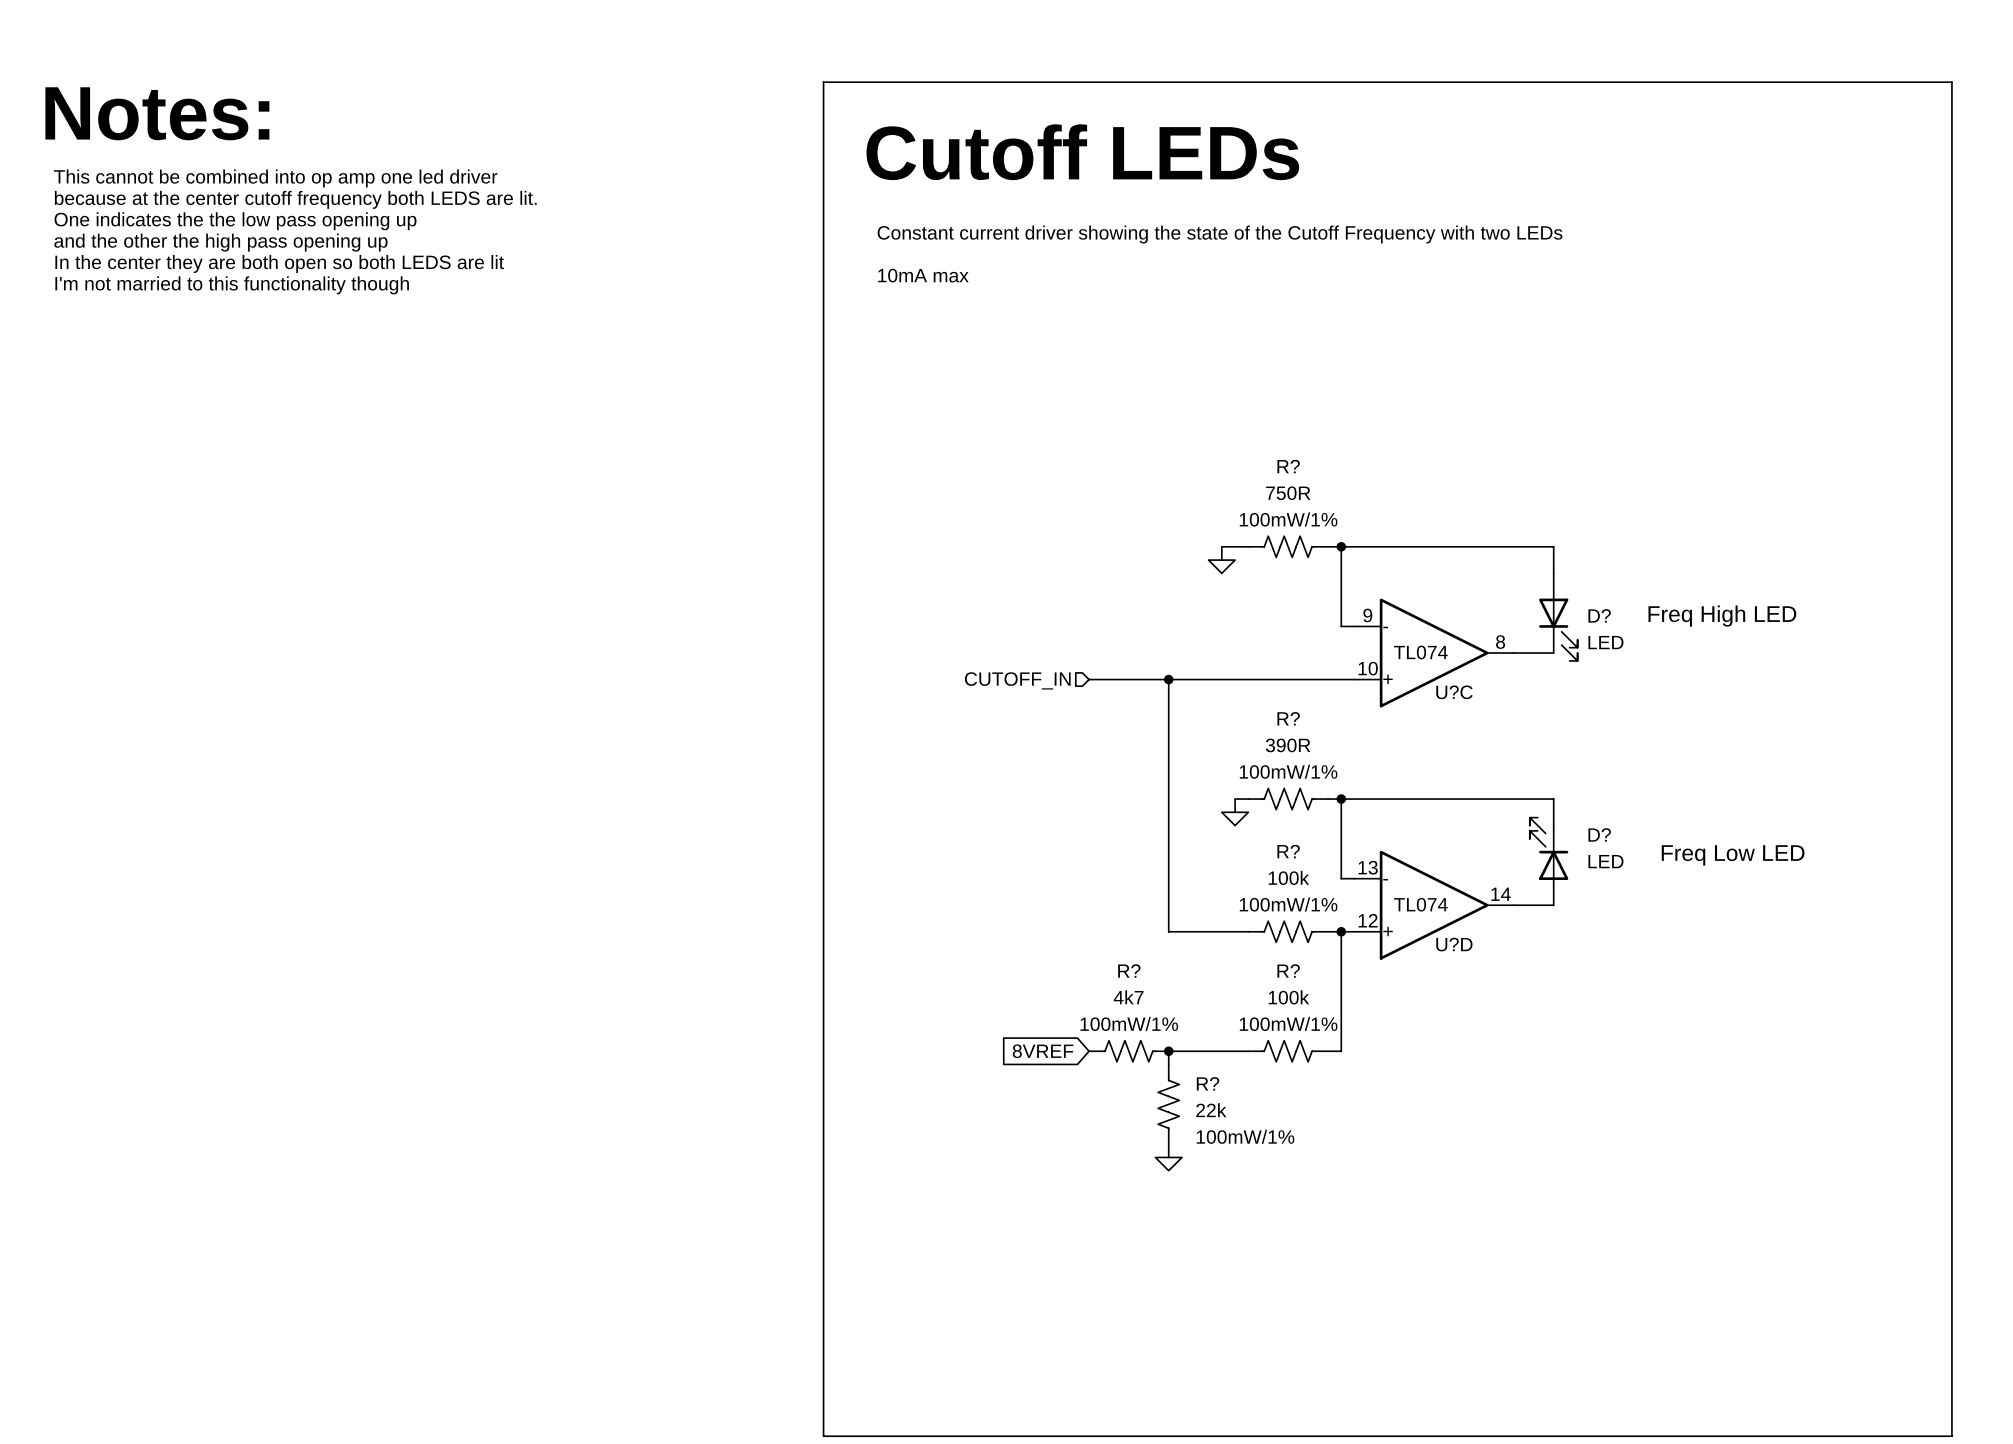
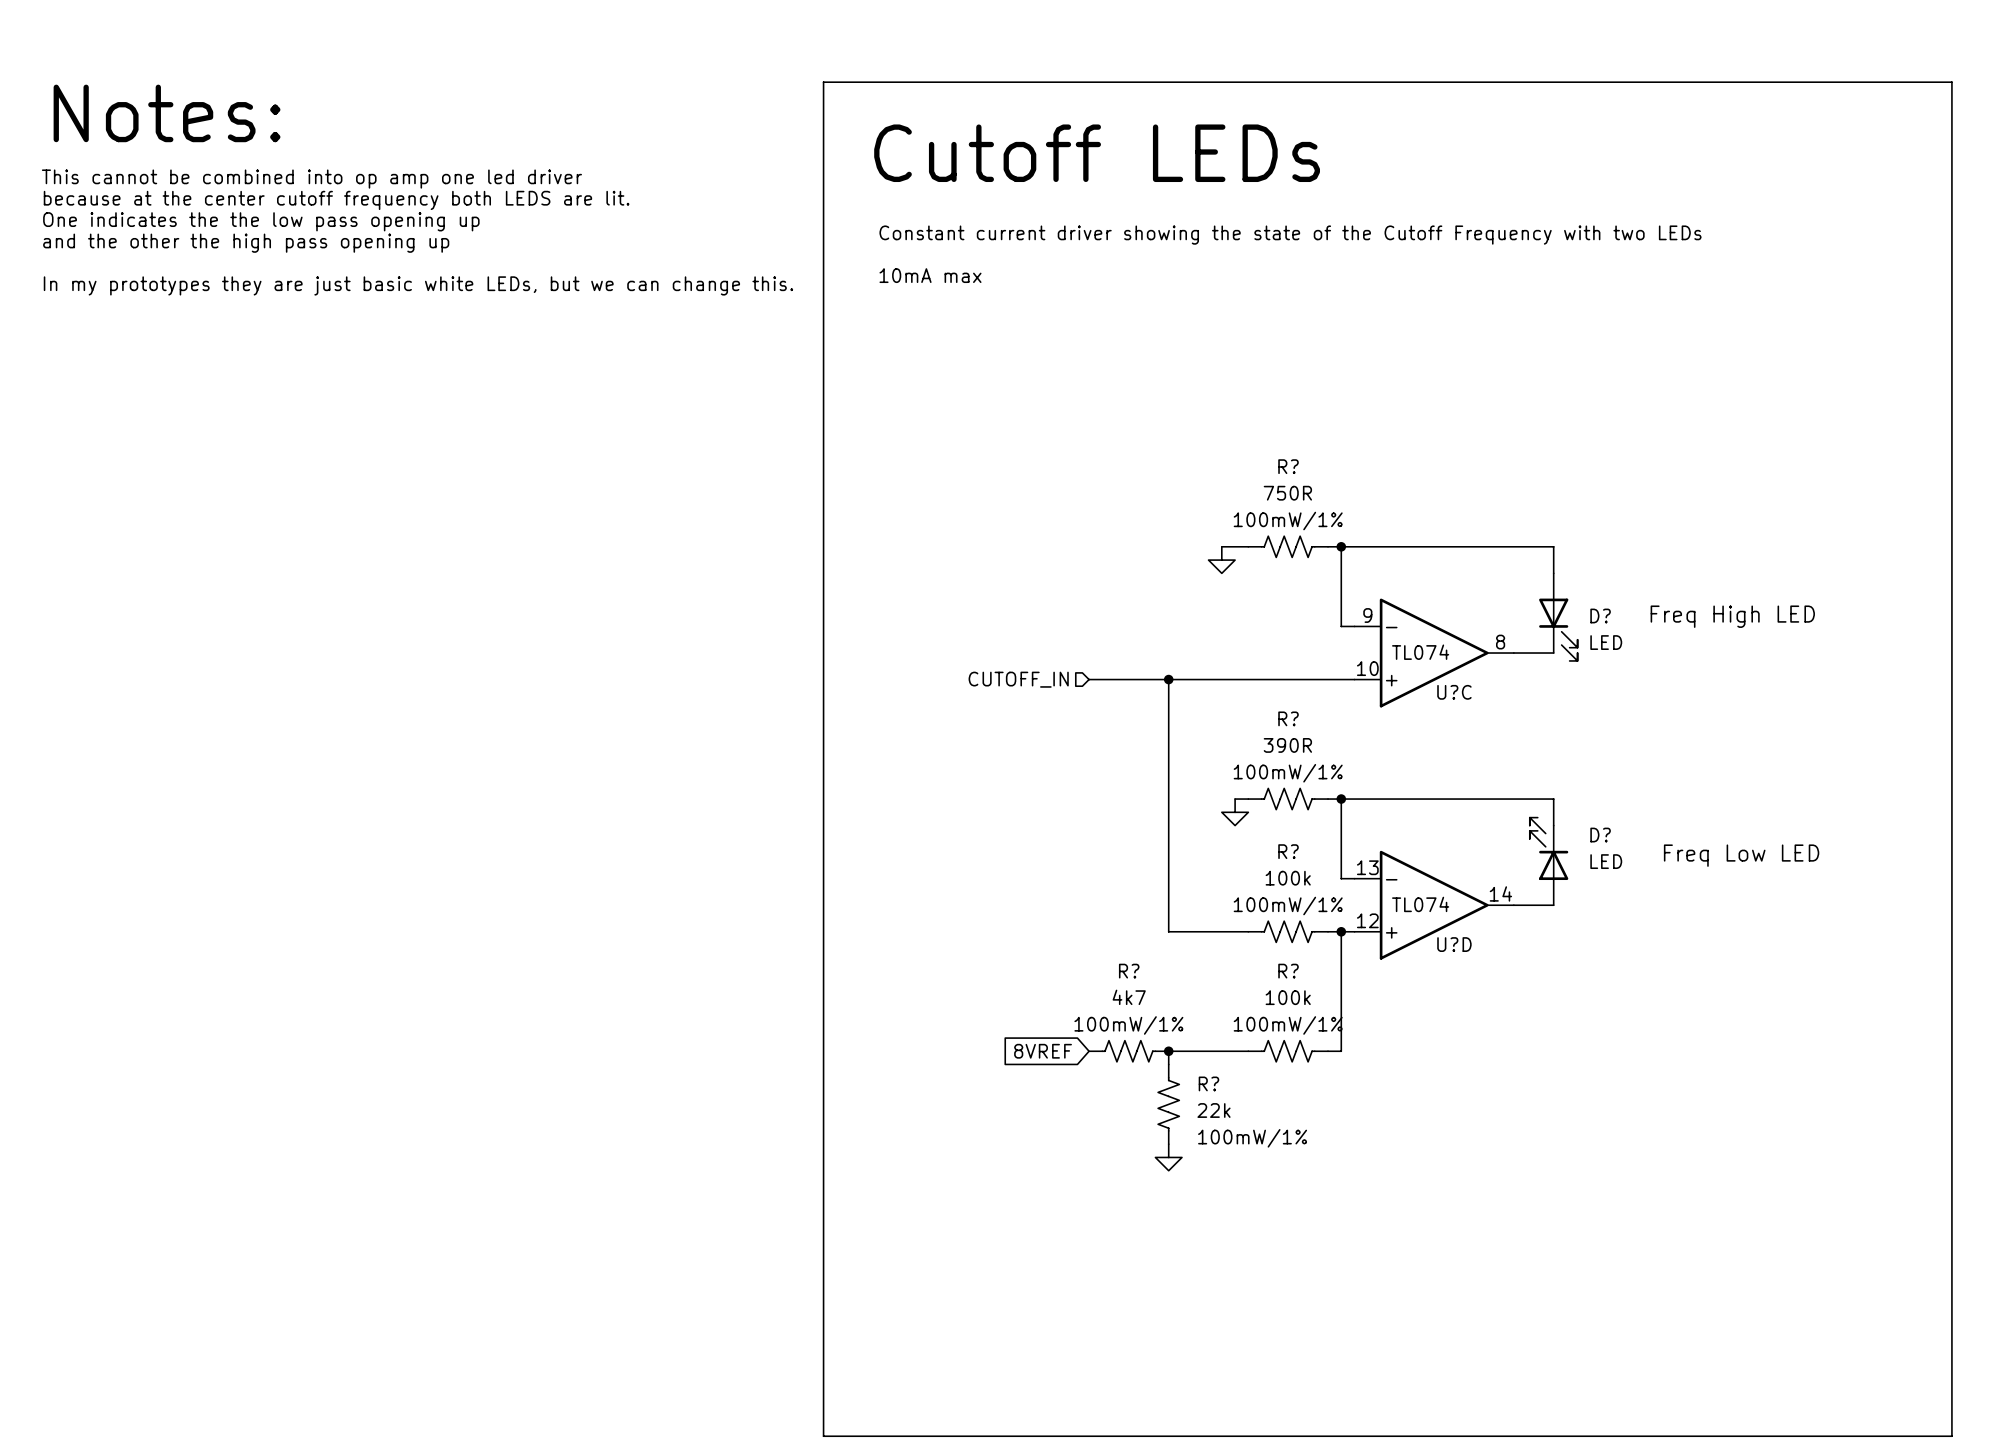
text position: This cannot be combined into op amp one led driver (275, 178) -> This cannot be combined into op amp one led driver (311, 179)
text position: because at the center cutoff frequency both LEDS are lit. (295, 199) -> because at the center cutoff frequency both LEDS are lit. (336, 200)
text position: One indicates the the low pass opening up (235, 221) -> One indicates the the low pass opening up (261, 221)
text position: and the other the high pass opening up (220, 242) -> and the other the high pass opening up (246, 243)
text: In the center they are both open so both LEDS are lit (279, 263) -> none
text: I'm not married to this functionality though (232, 285) -> none
text: none -> In my prototypes they are just basic white LEDs, but we can change this. (418, 285)

